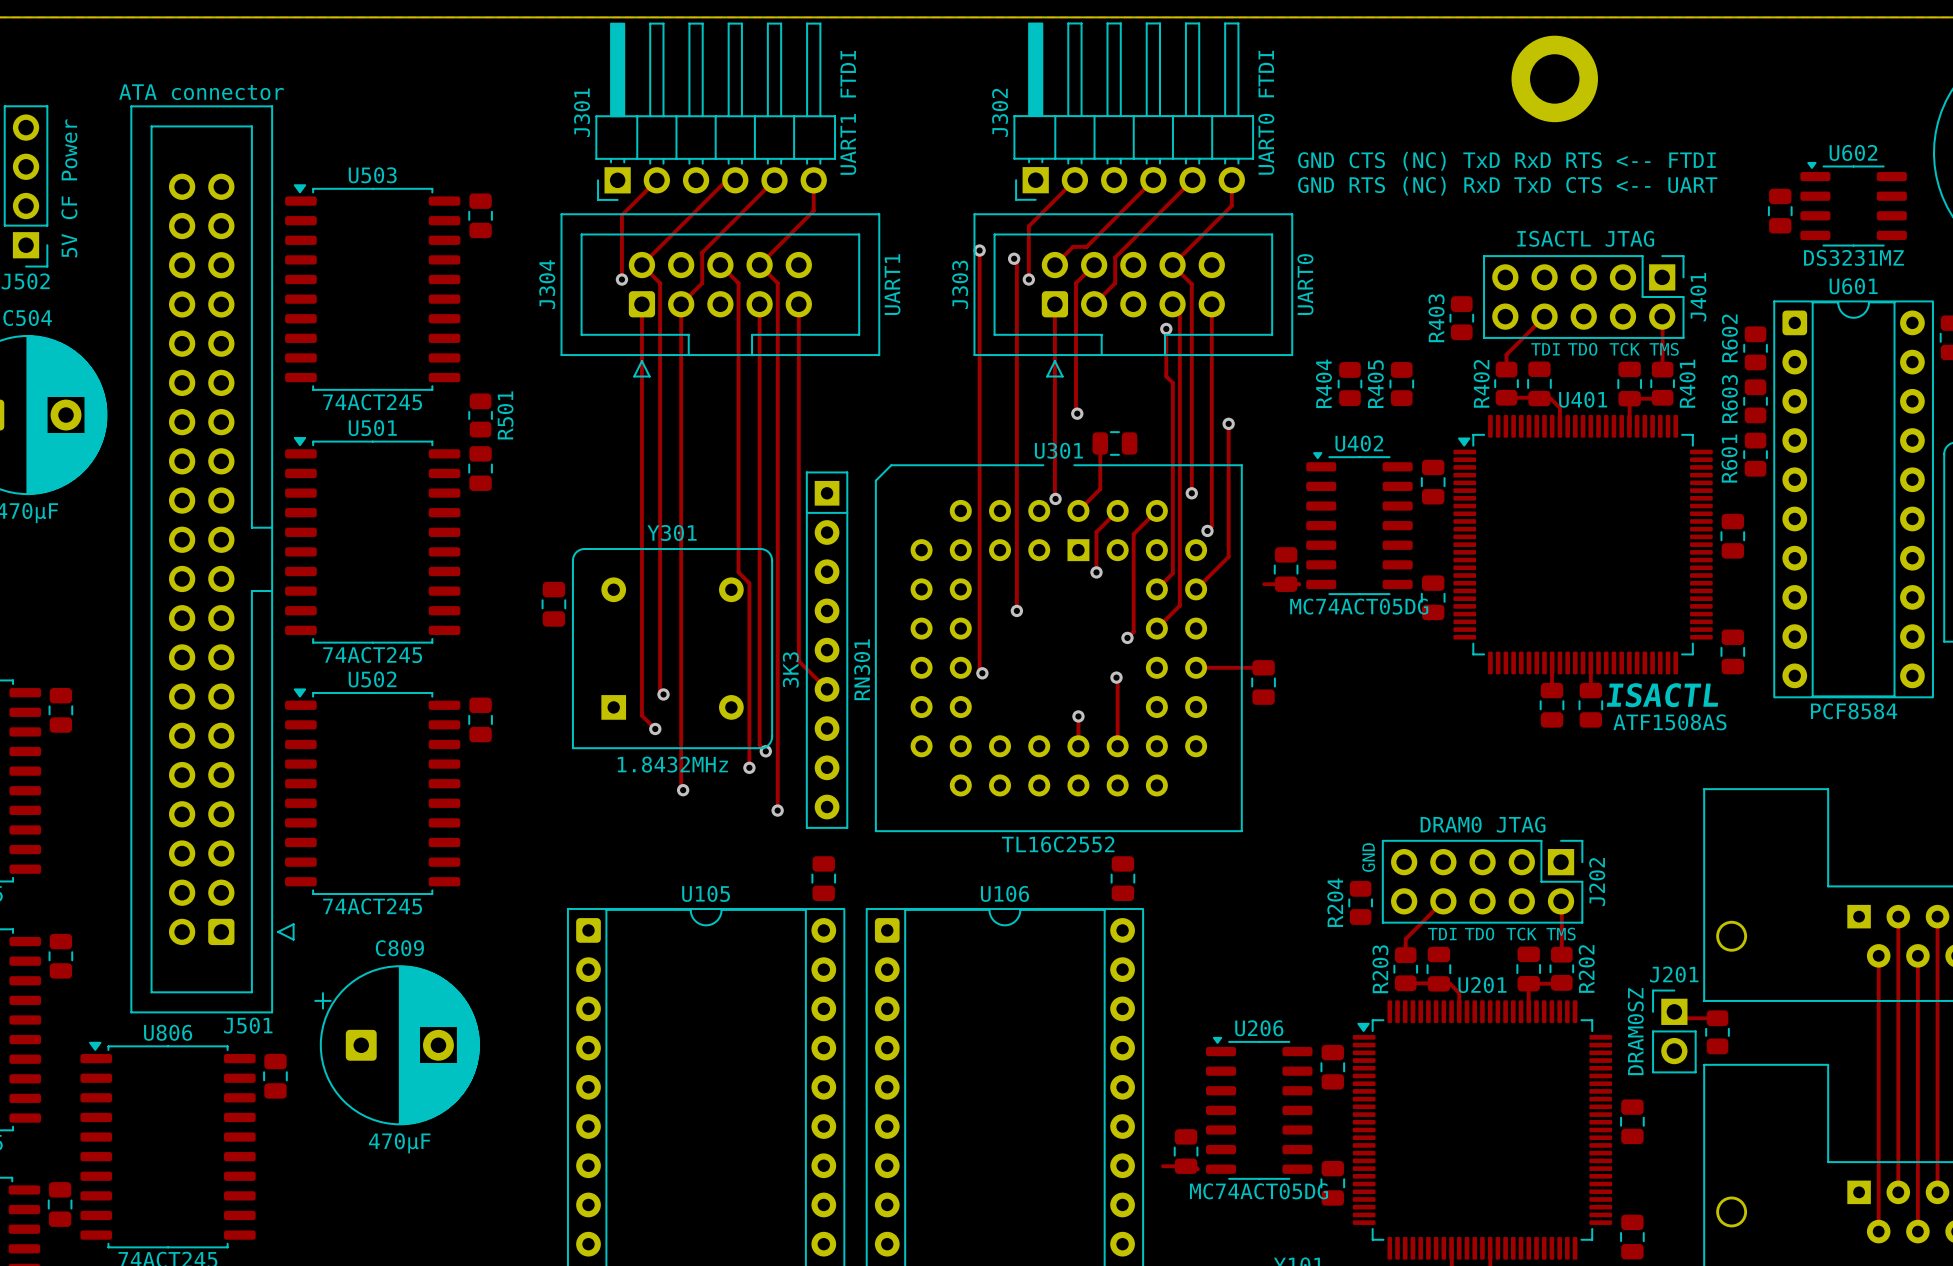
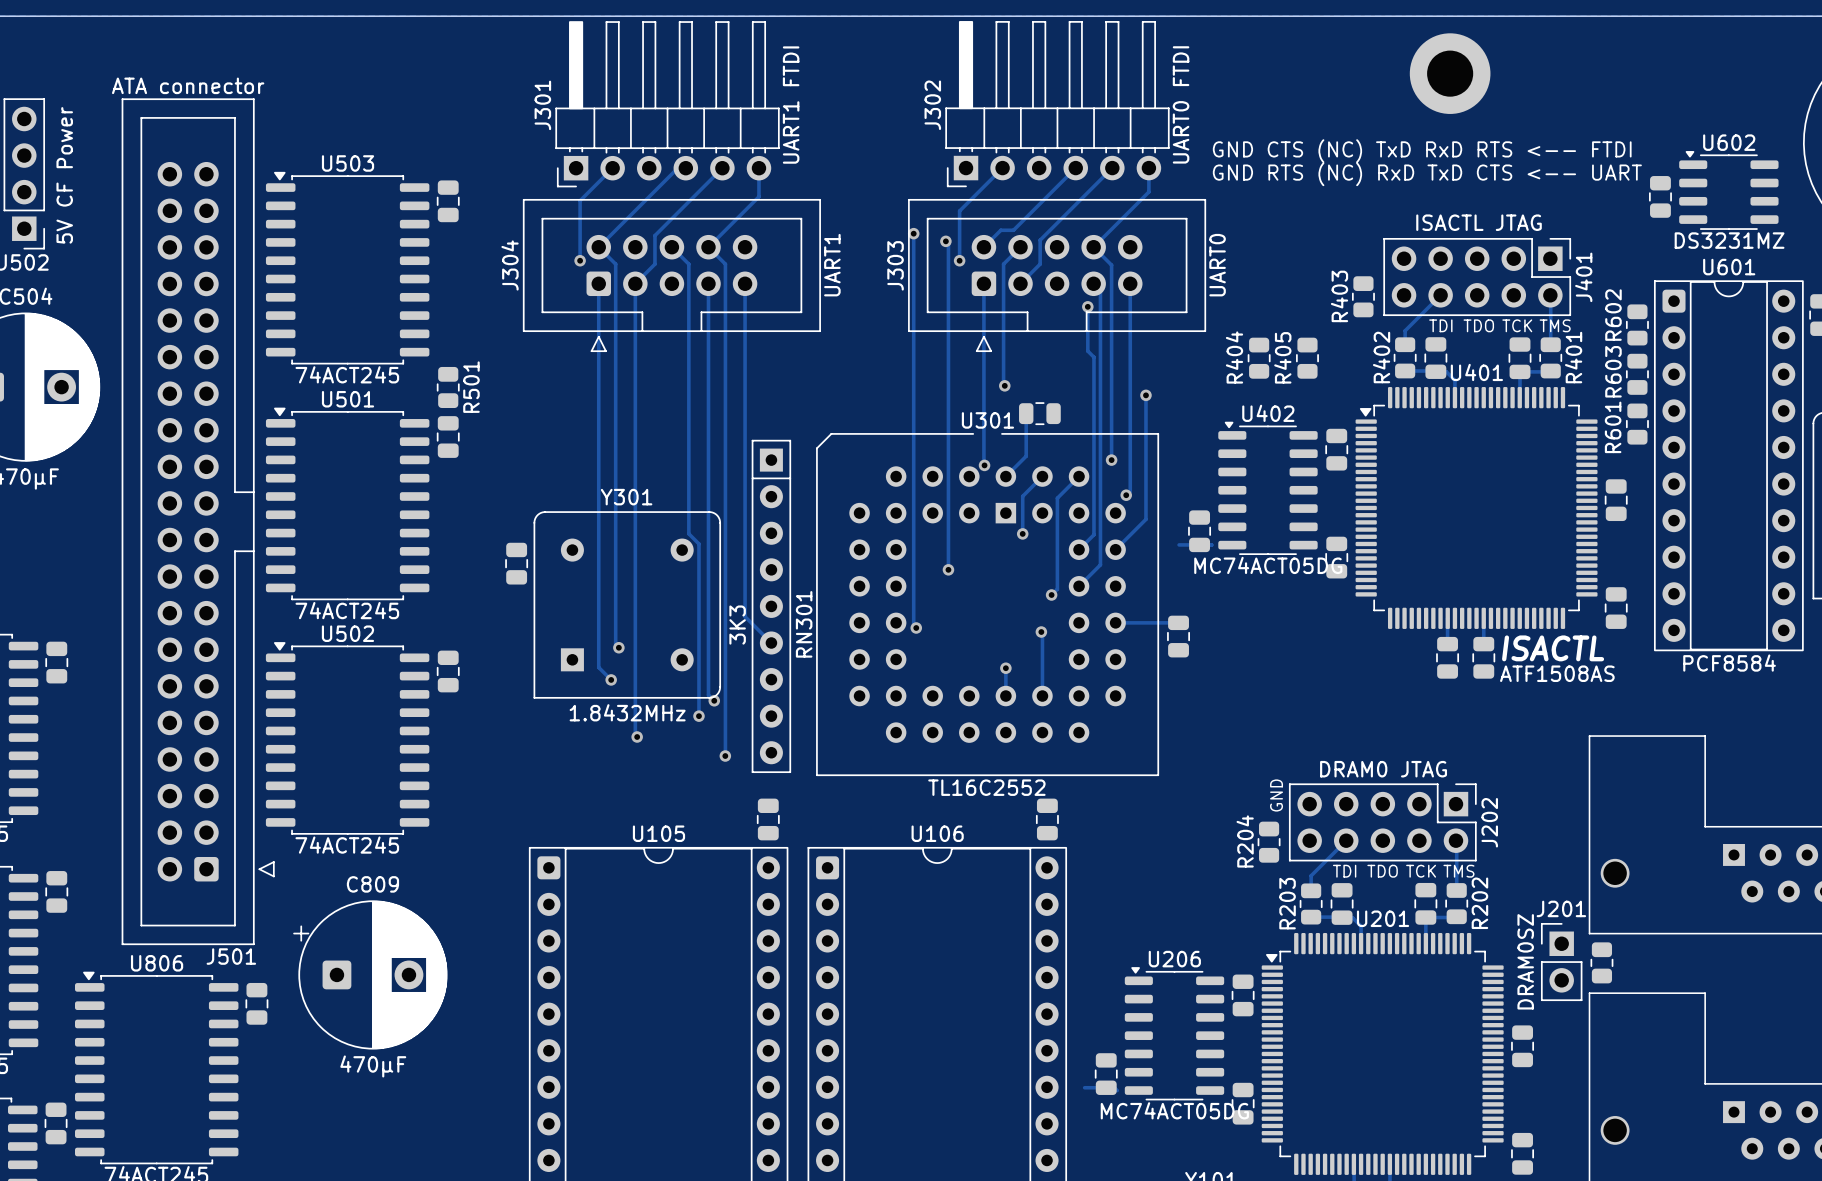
track: (1898, 916) (1898, 1192) -> none
track: (1937, 916) (1937, 1192) -> none
track: (1878, 955) (1878, 1231) -> none
track: (1917, 955) (1917, 1231) -> none
track: (1674, 1011) (1680, 1018) (1717, 1018) -> none

